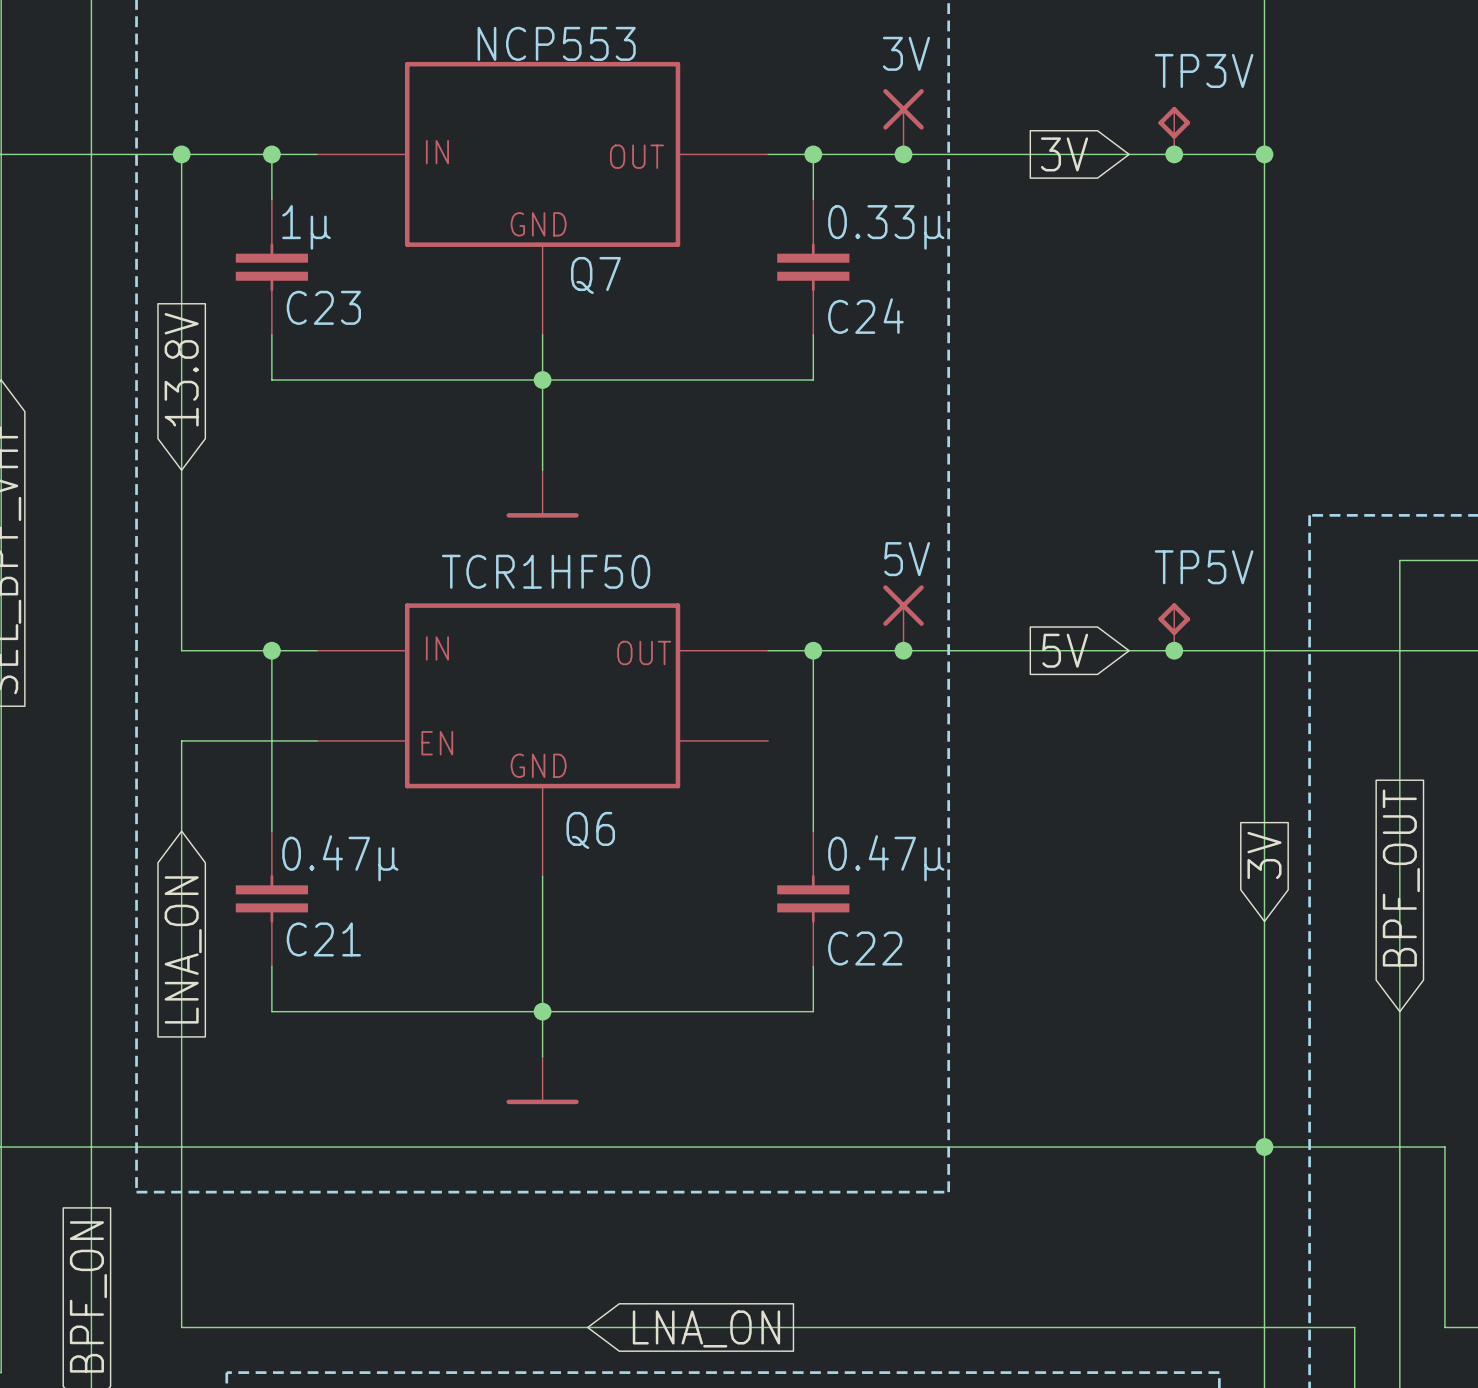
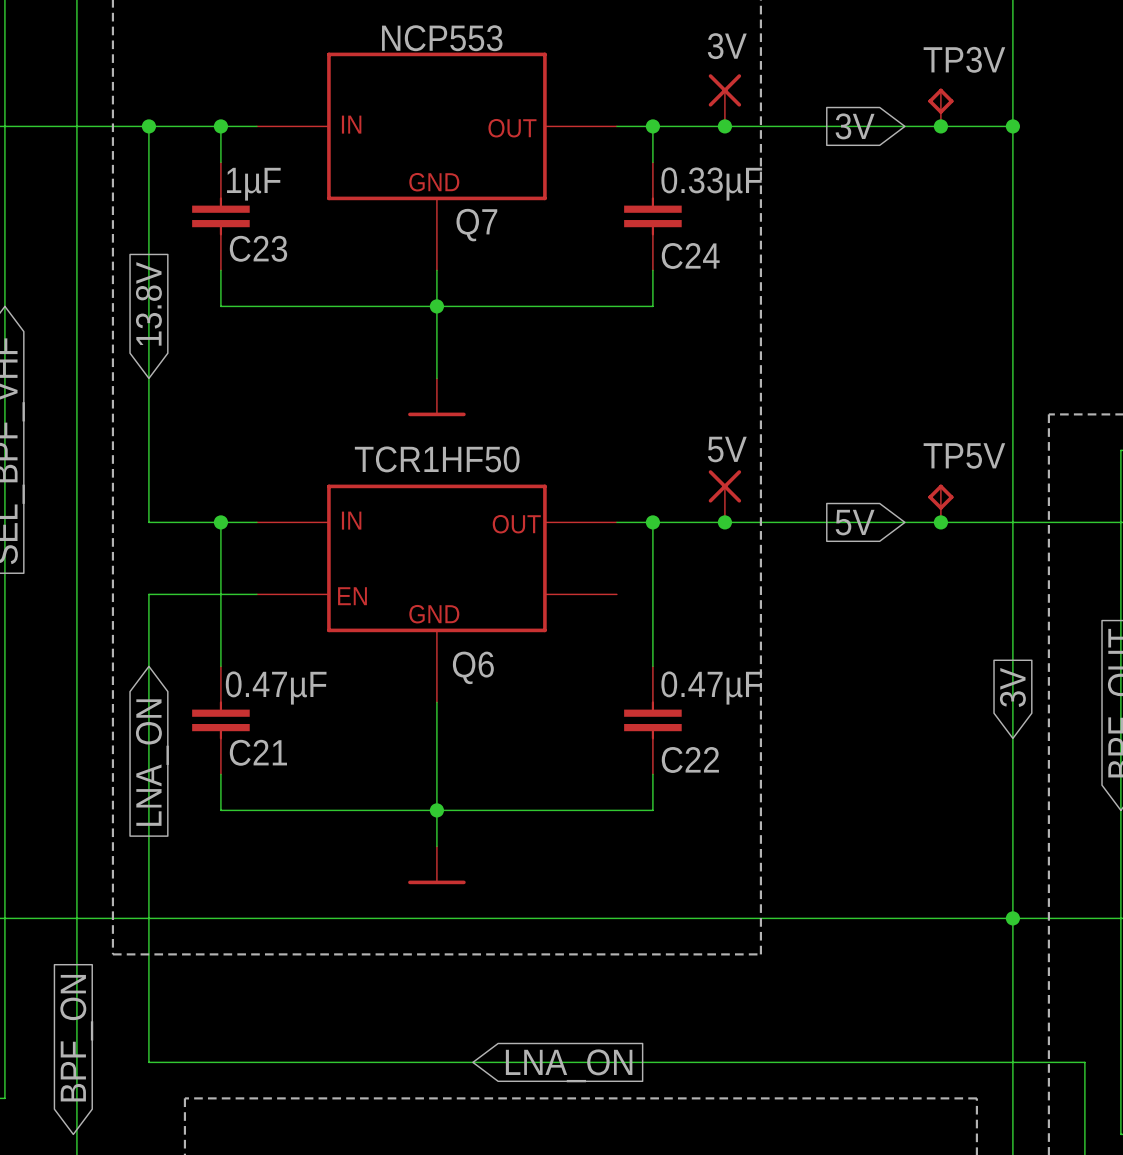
C23 value: 1µ (306, 227) -> 1µF (253, 184)
C24 value: 0.33µ (886, 227) -> 0.33µF (711, 184)
C21 value: 0.47µ (340, 858) -> 0.47µF (276, 688)
C22 value: 0.47µ (886, 858) -> 0.47µF (711, 688)

